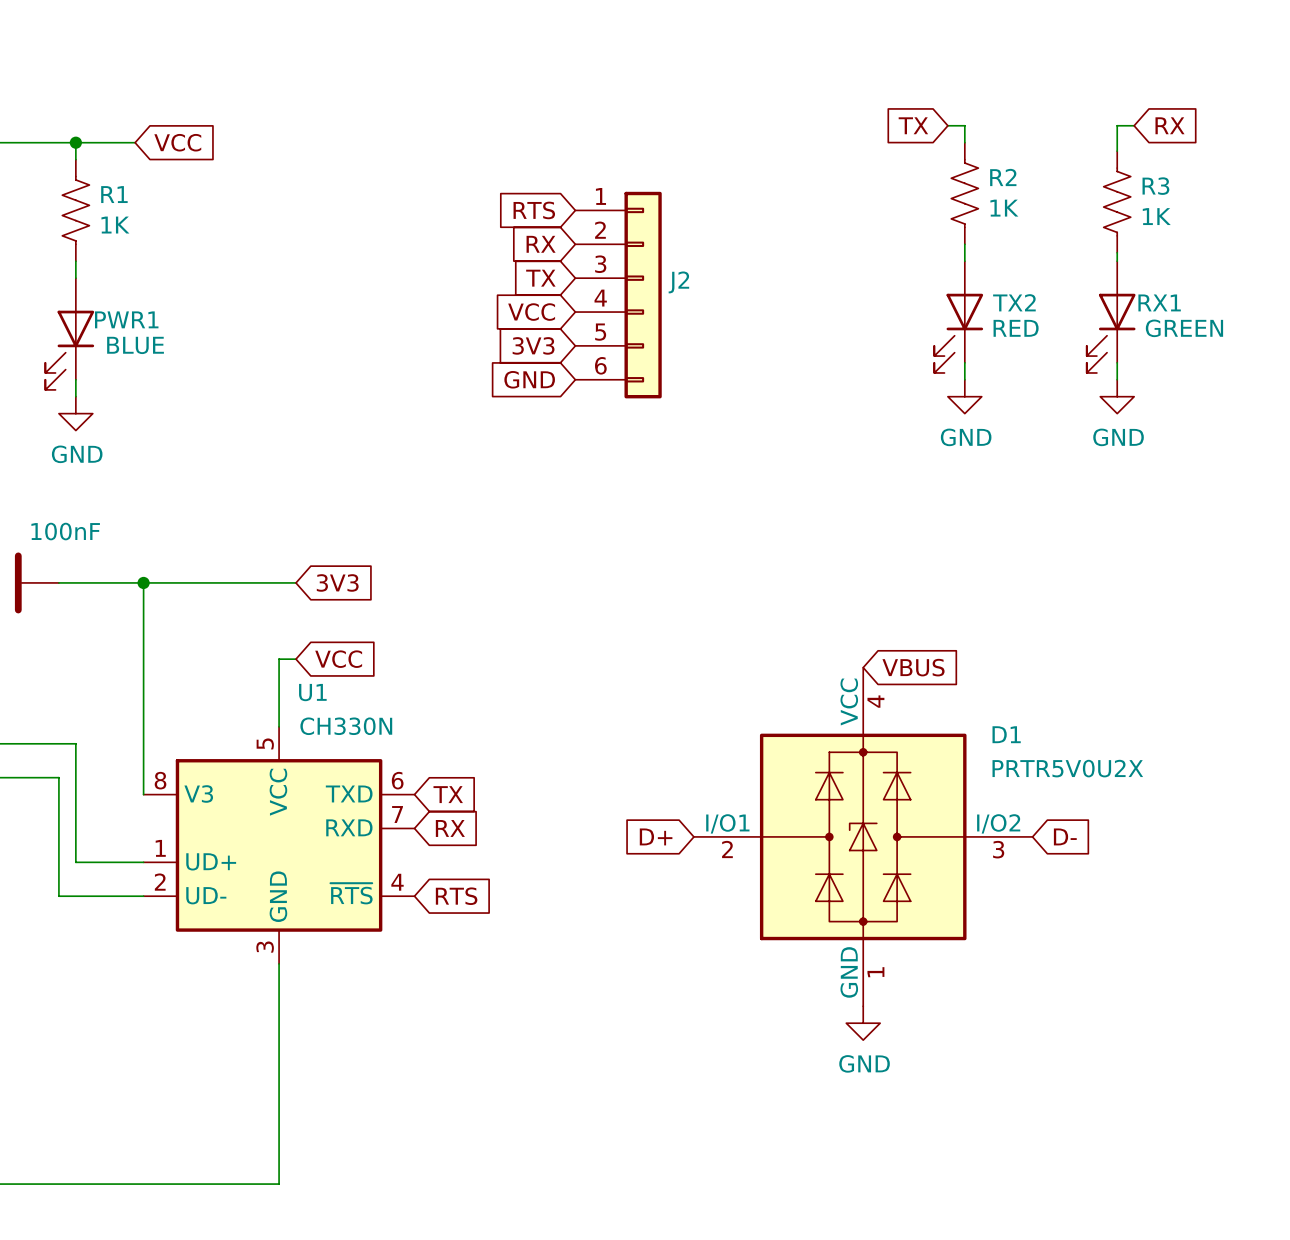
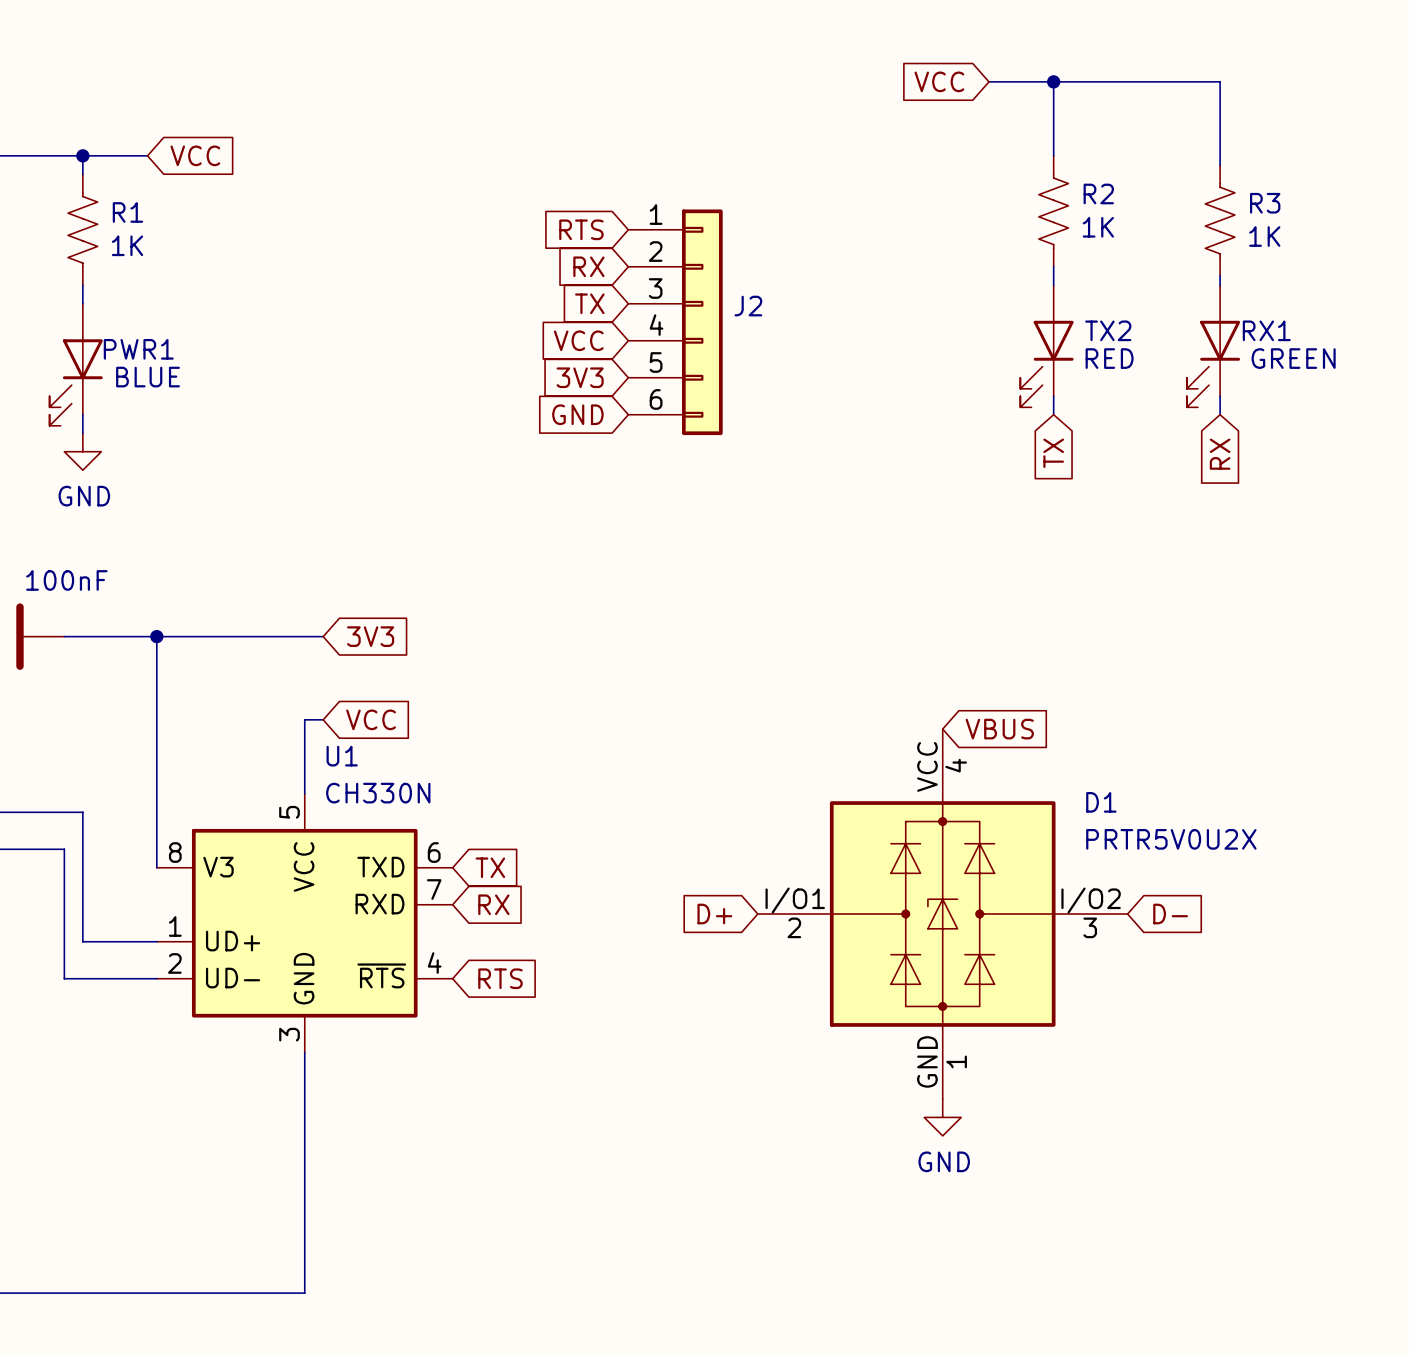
global label: none -> VCC (939, 81)
junction: none -> (1053, 81)
global label rotation: 0° (913, 125) -> 90° counterclockwise (1053, 453)
global label position: TX (913, 125) -> TX (1053, 453)
wire: (947, 125) (964, 125) -> (1053, 81) (1053, 137)
wire: (1117, 125) (1134, 125) -> (1220, 137) (1220, 81) (988, 81)
global label rotation: 0° (1170, 125) -> 90° clockwise (1220, 454)
global label position: RX (1170, 125) -> RX (1220, 454)
power symbol: GND (964, 396) -> none
power symbol: GND (1117, 396) -> none

